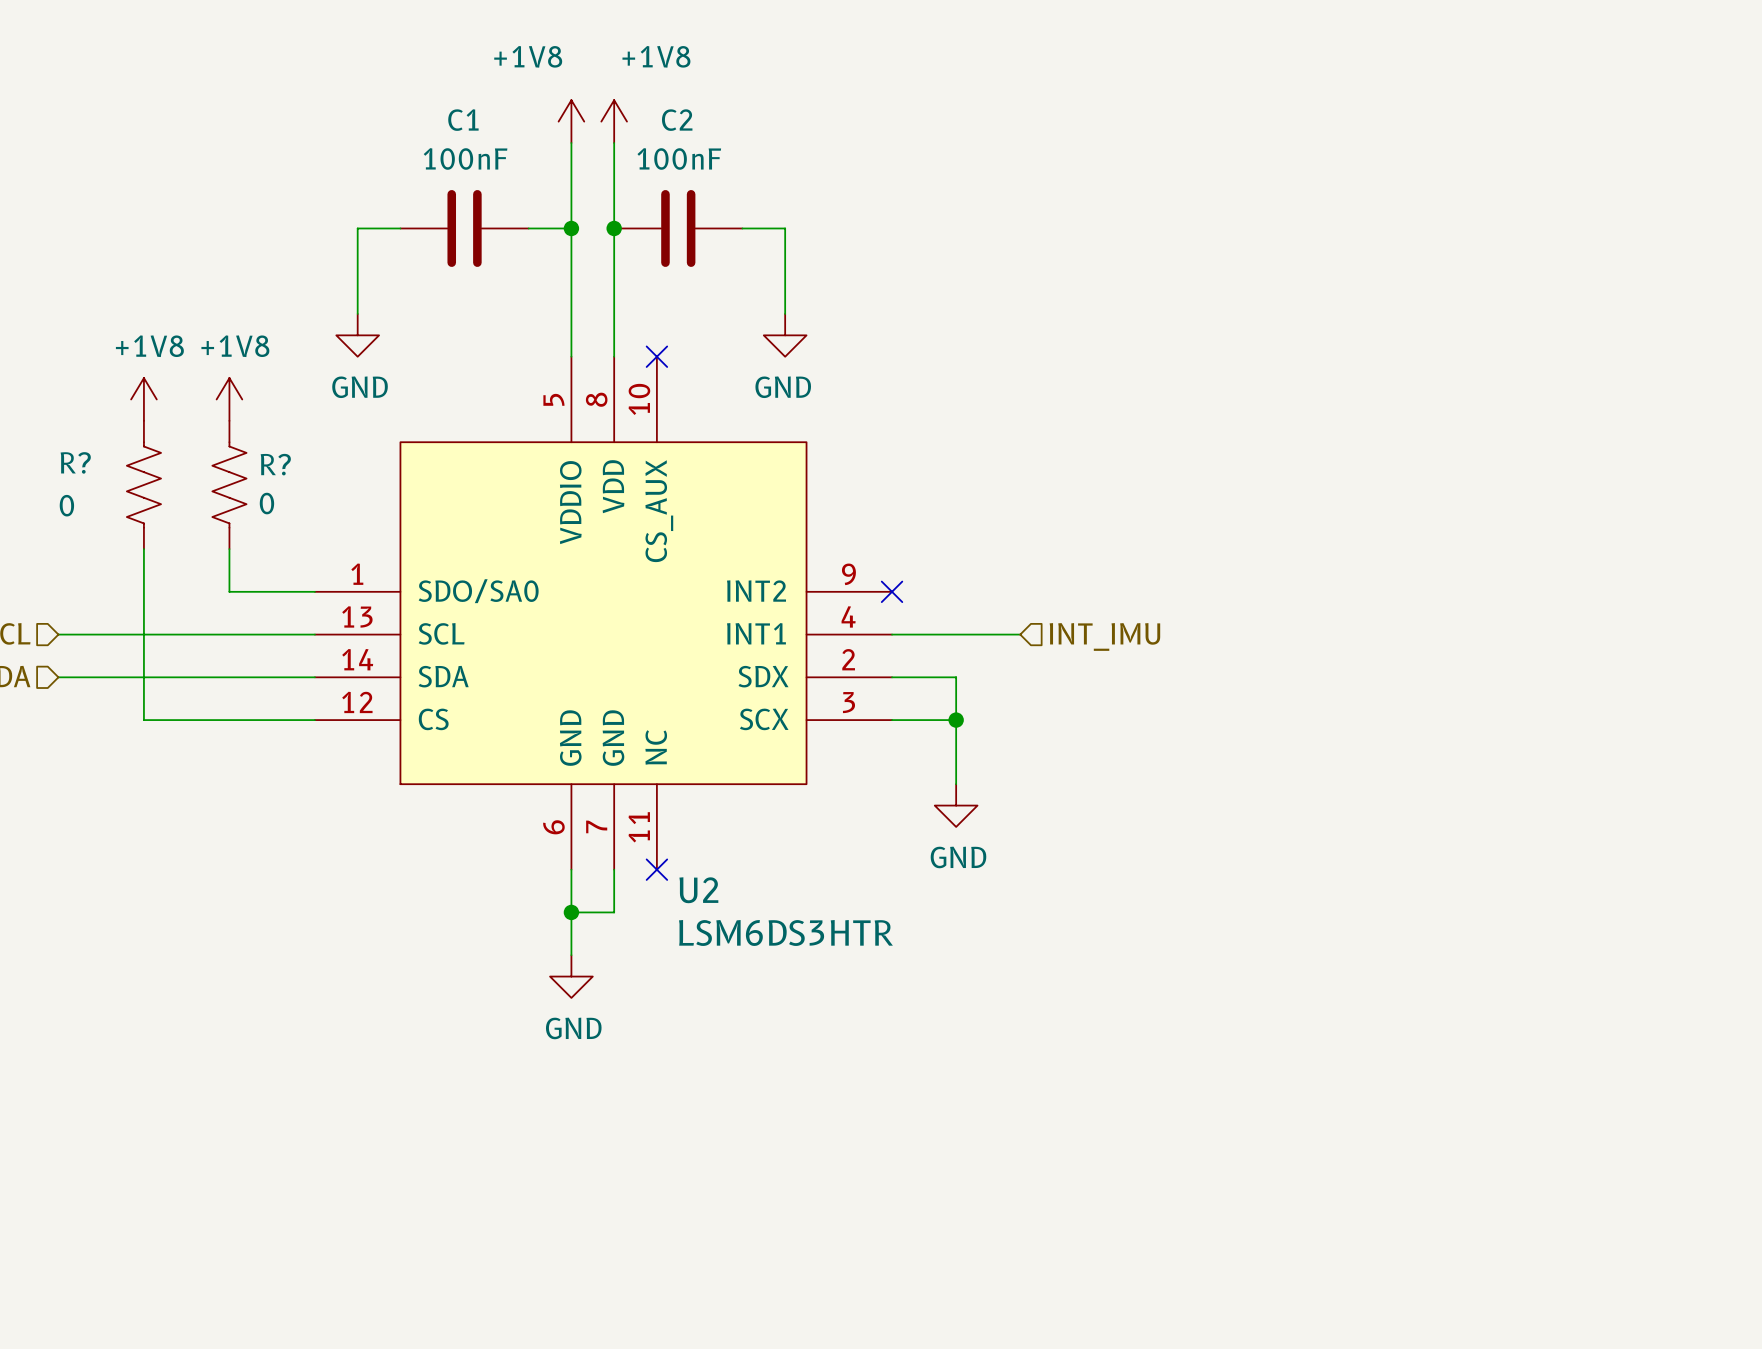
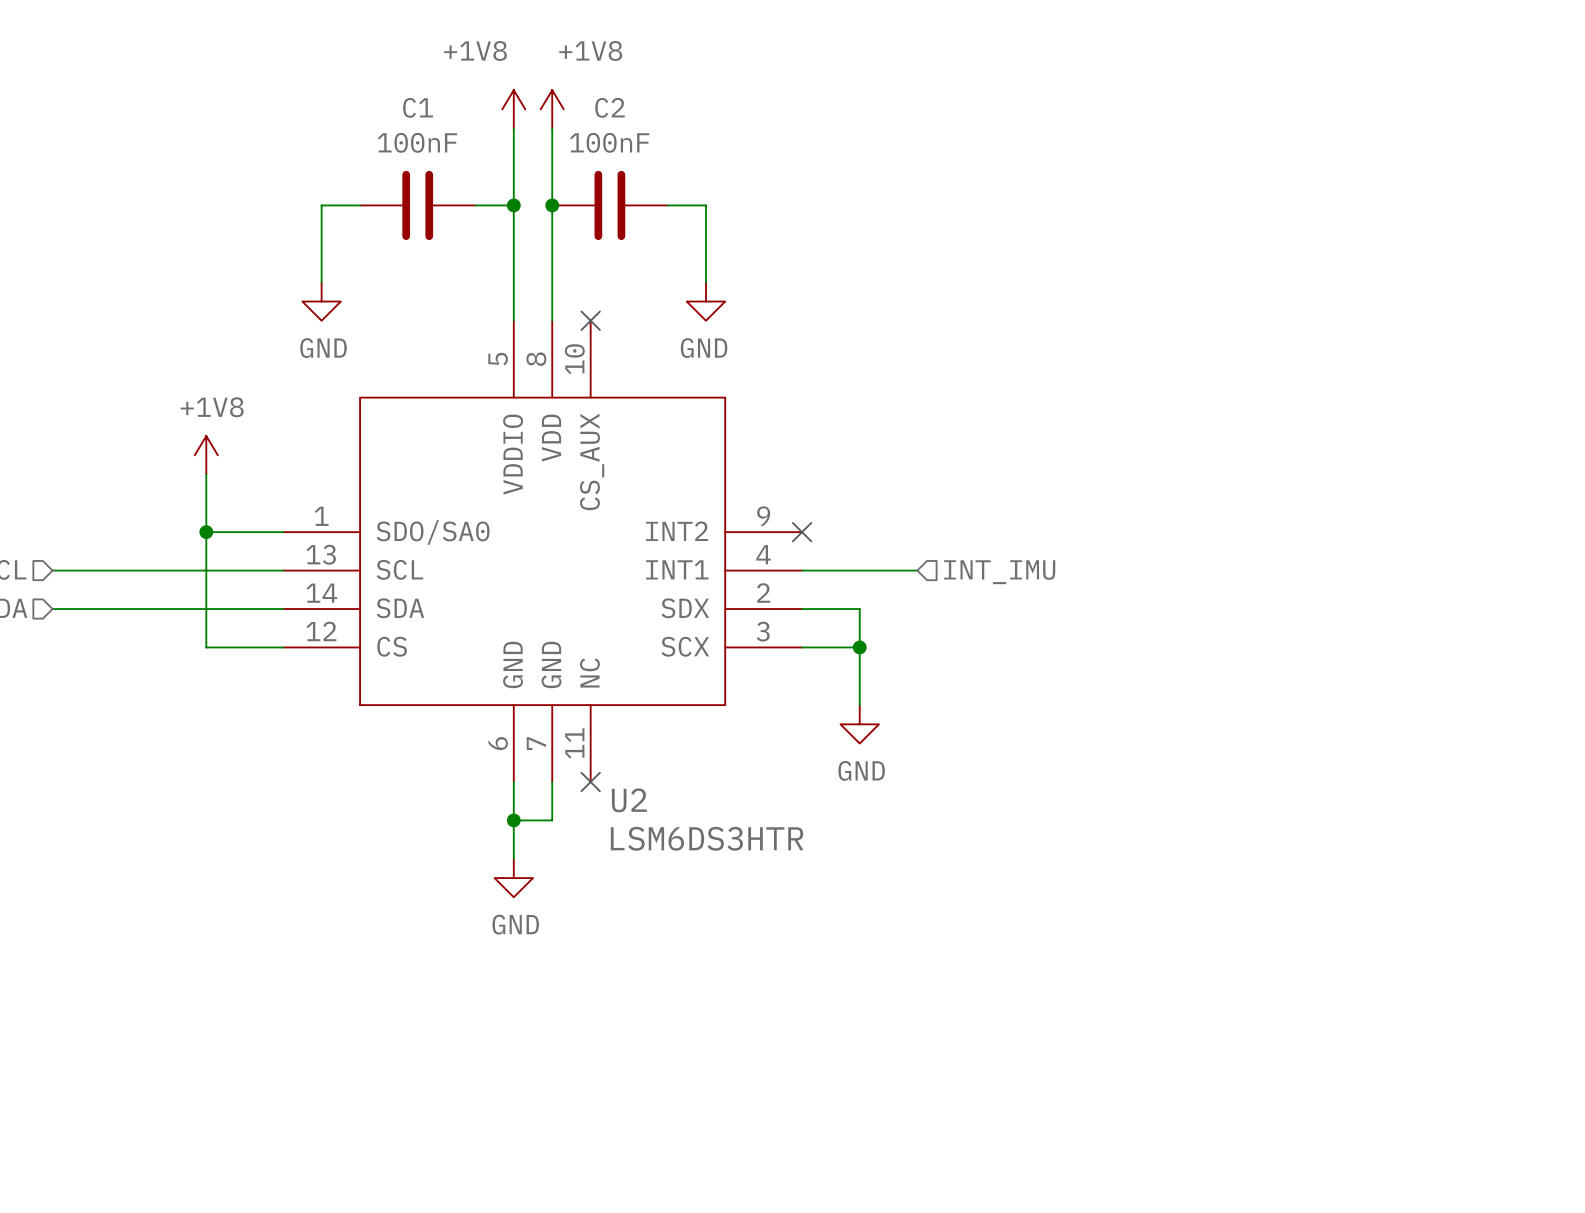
power symbol: +1V8 (143, 399) -> none
power symbol: +1V8 (229, 399) -> none
R?: 0 (143, 484) -> none
R?: 0 (229, 484) -> none
power symbol: none -> +1V8 (206, 455)
wire: (143, 549) (143, 720) (229, 720) -> (206, 532) (206, 647)
junction: none -> (206, 532)

